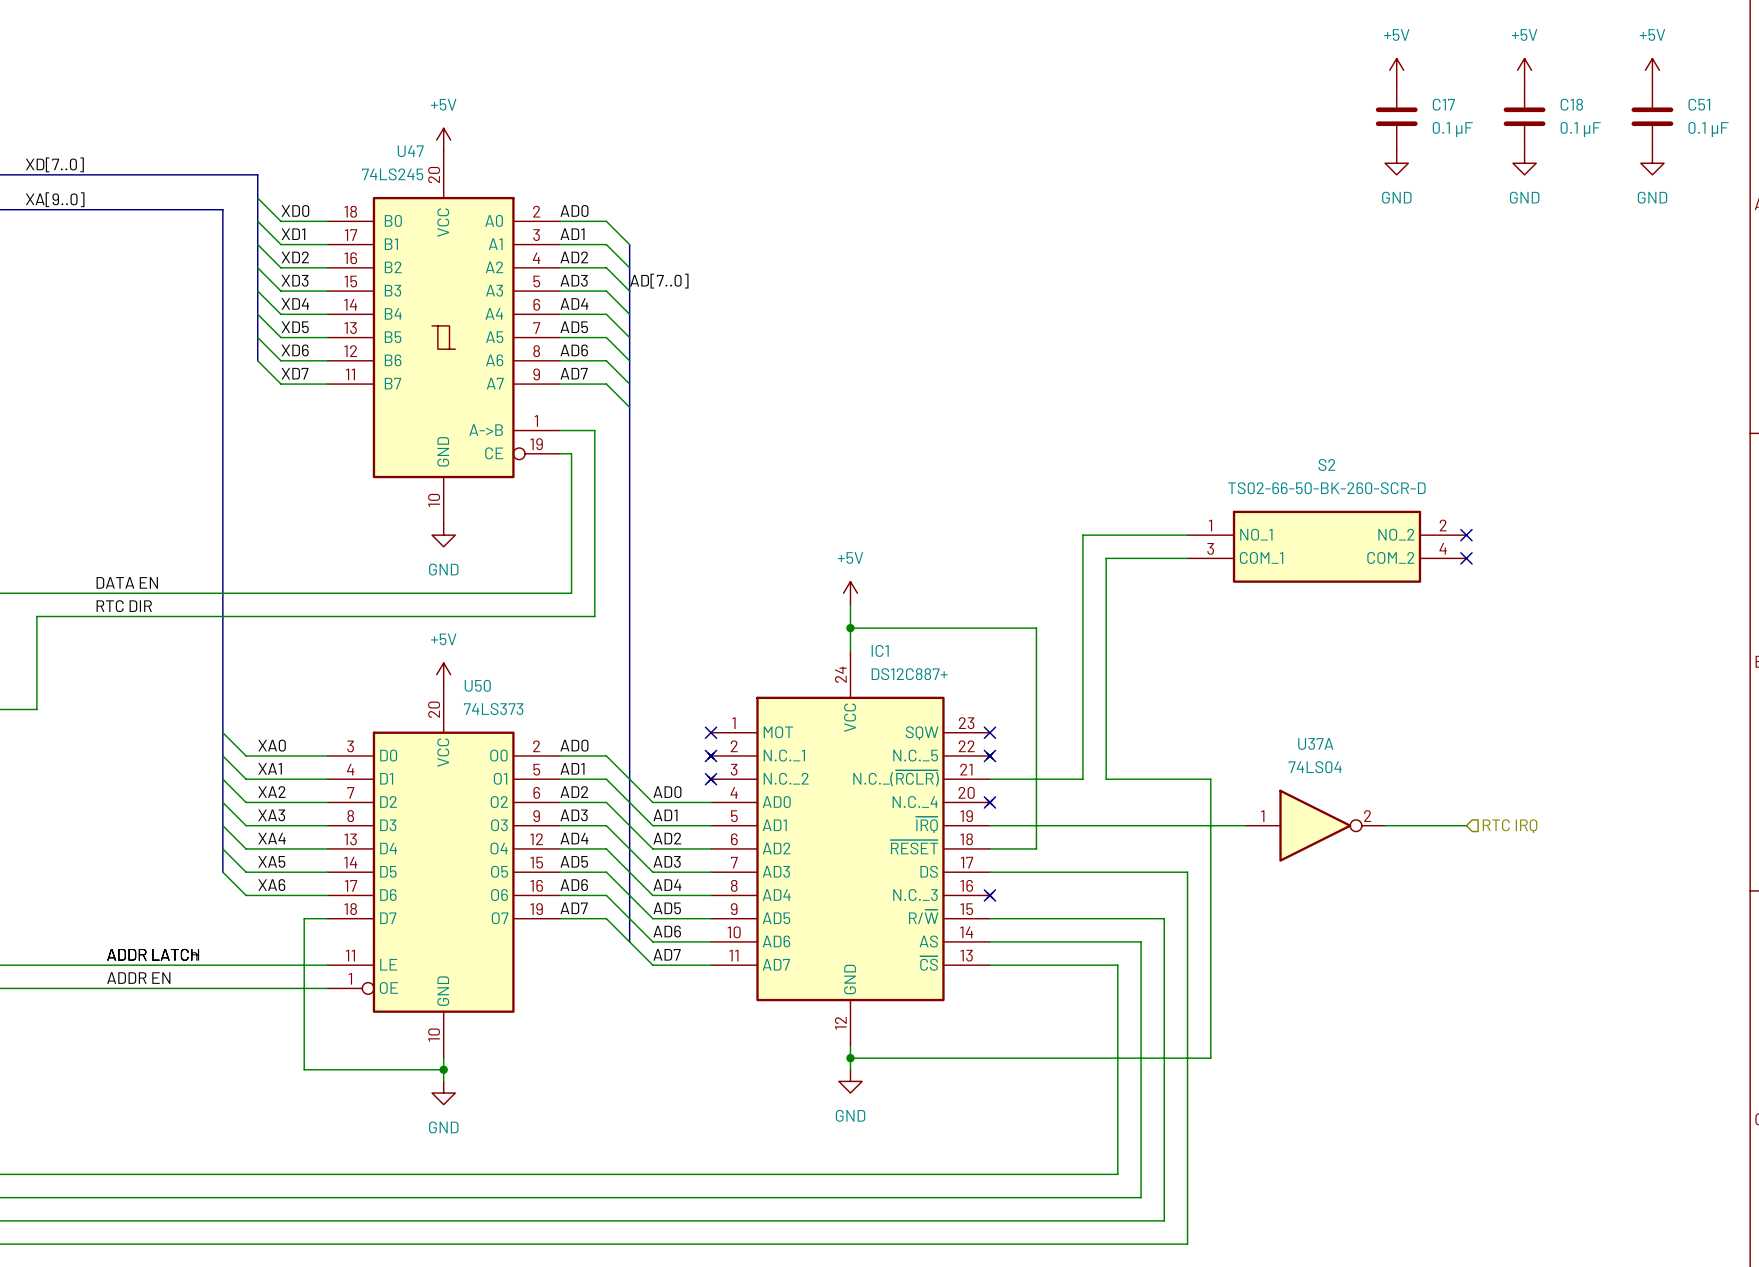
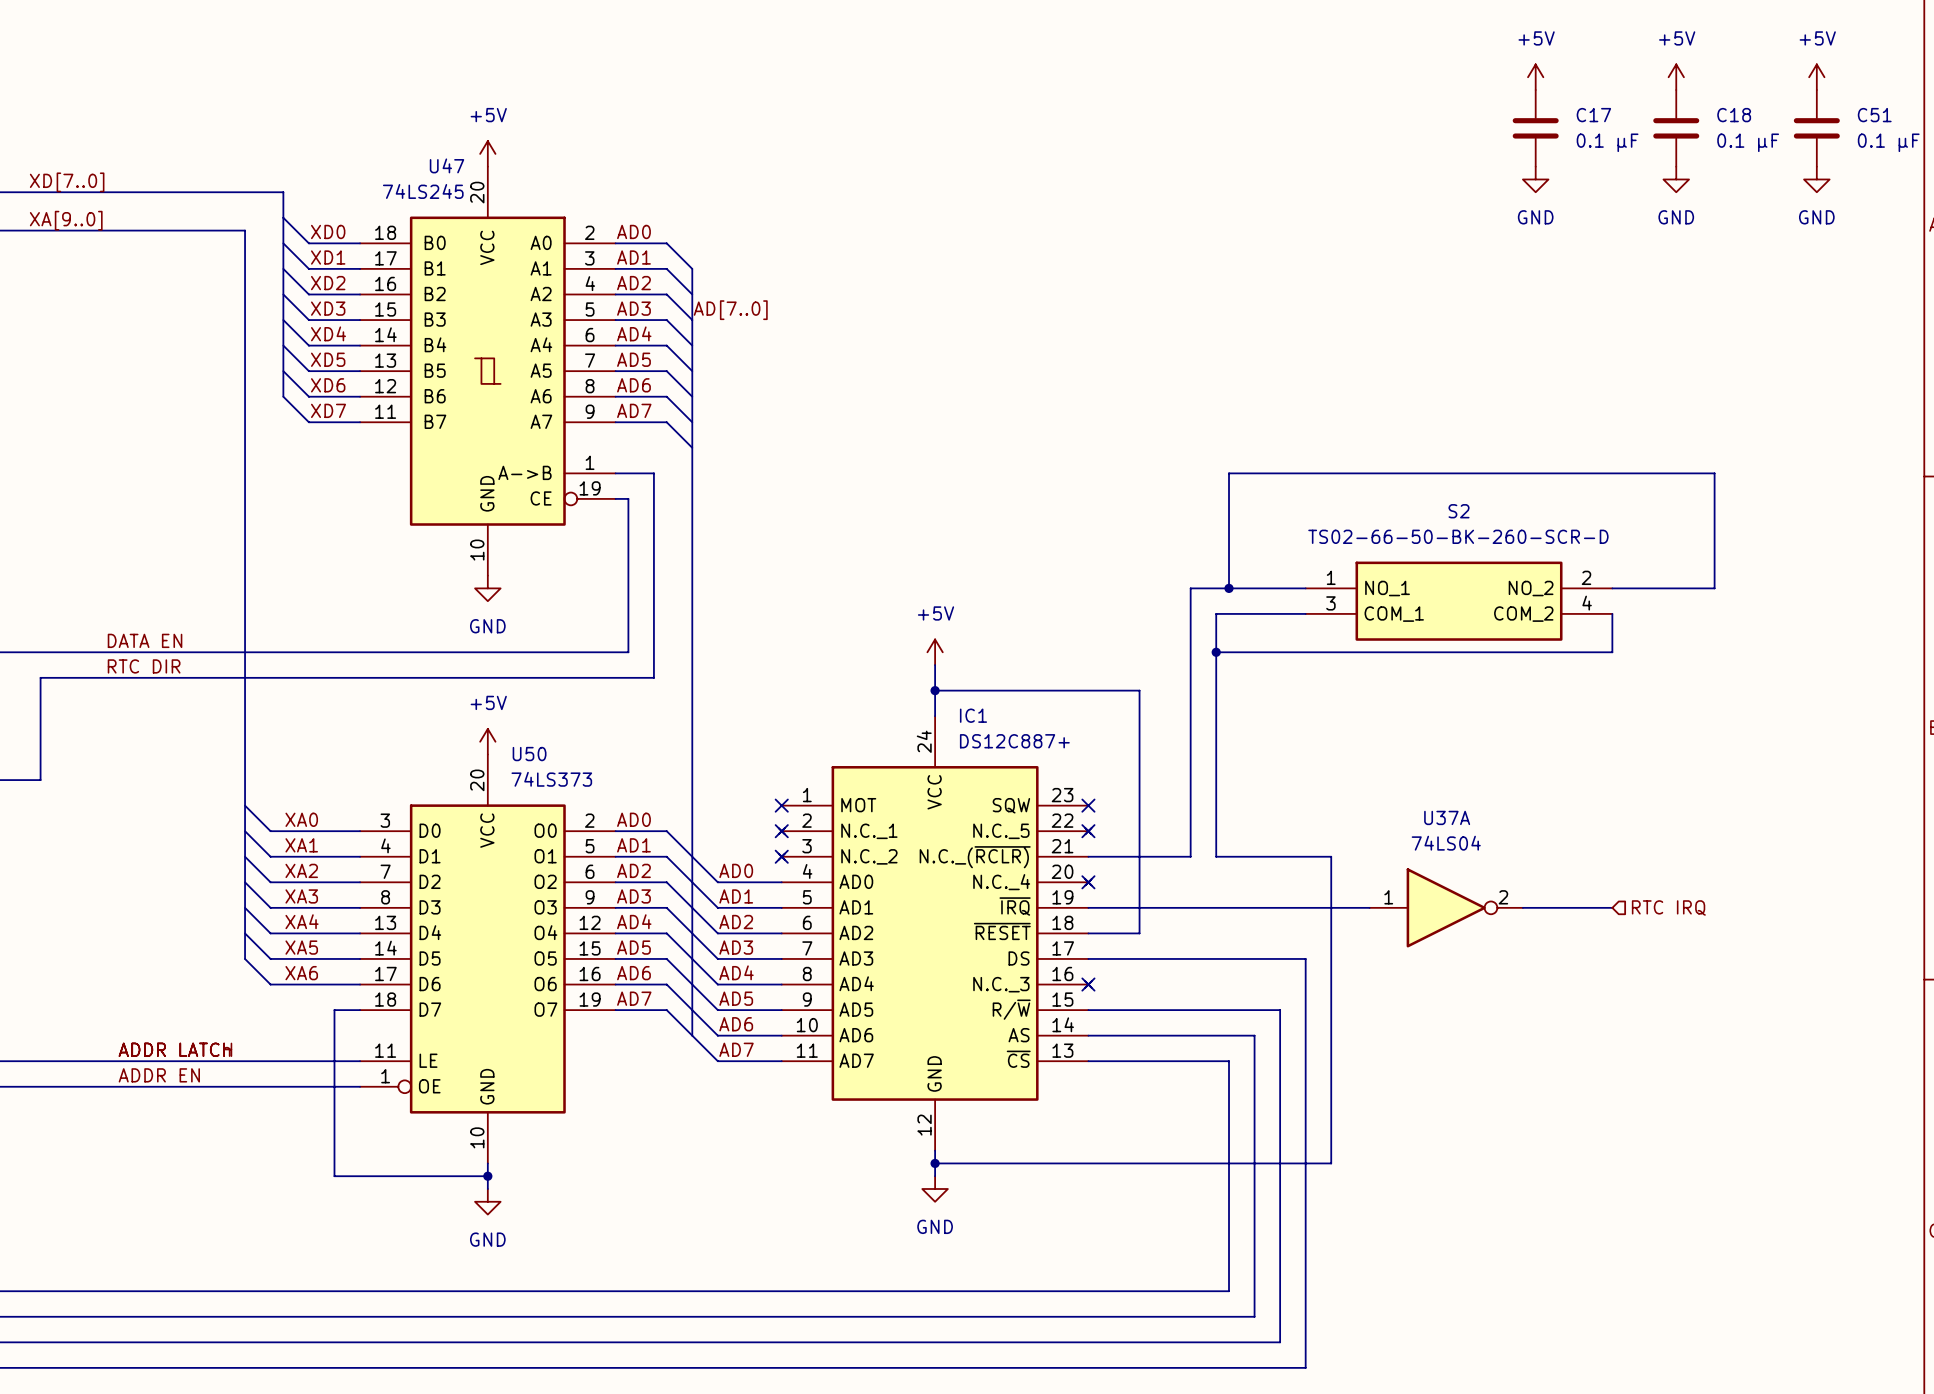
wire: none -> (1229, 588) (1229, 473) (1714, 473) (1714, 588) (1612, 588)
junction: none -> (1229, 588)
no-connect mark: (1466, 535) -> none
wire: none -> (1612, 613) (1612, 652) (1216, 652)
no-connect mark: (1466, 558) -> none
junction: none -> (1216, 652)

